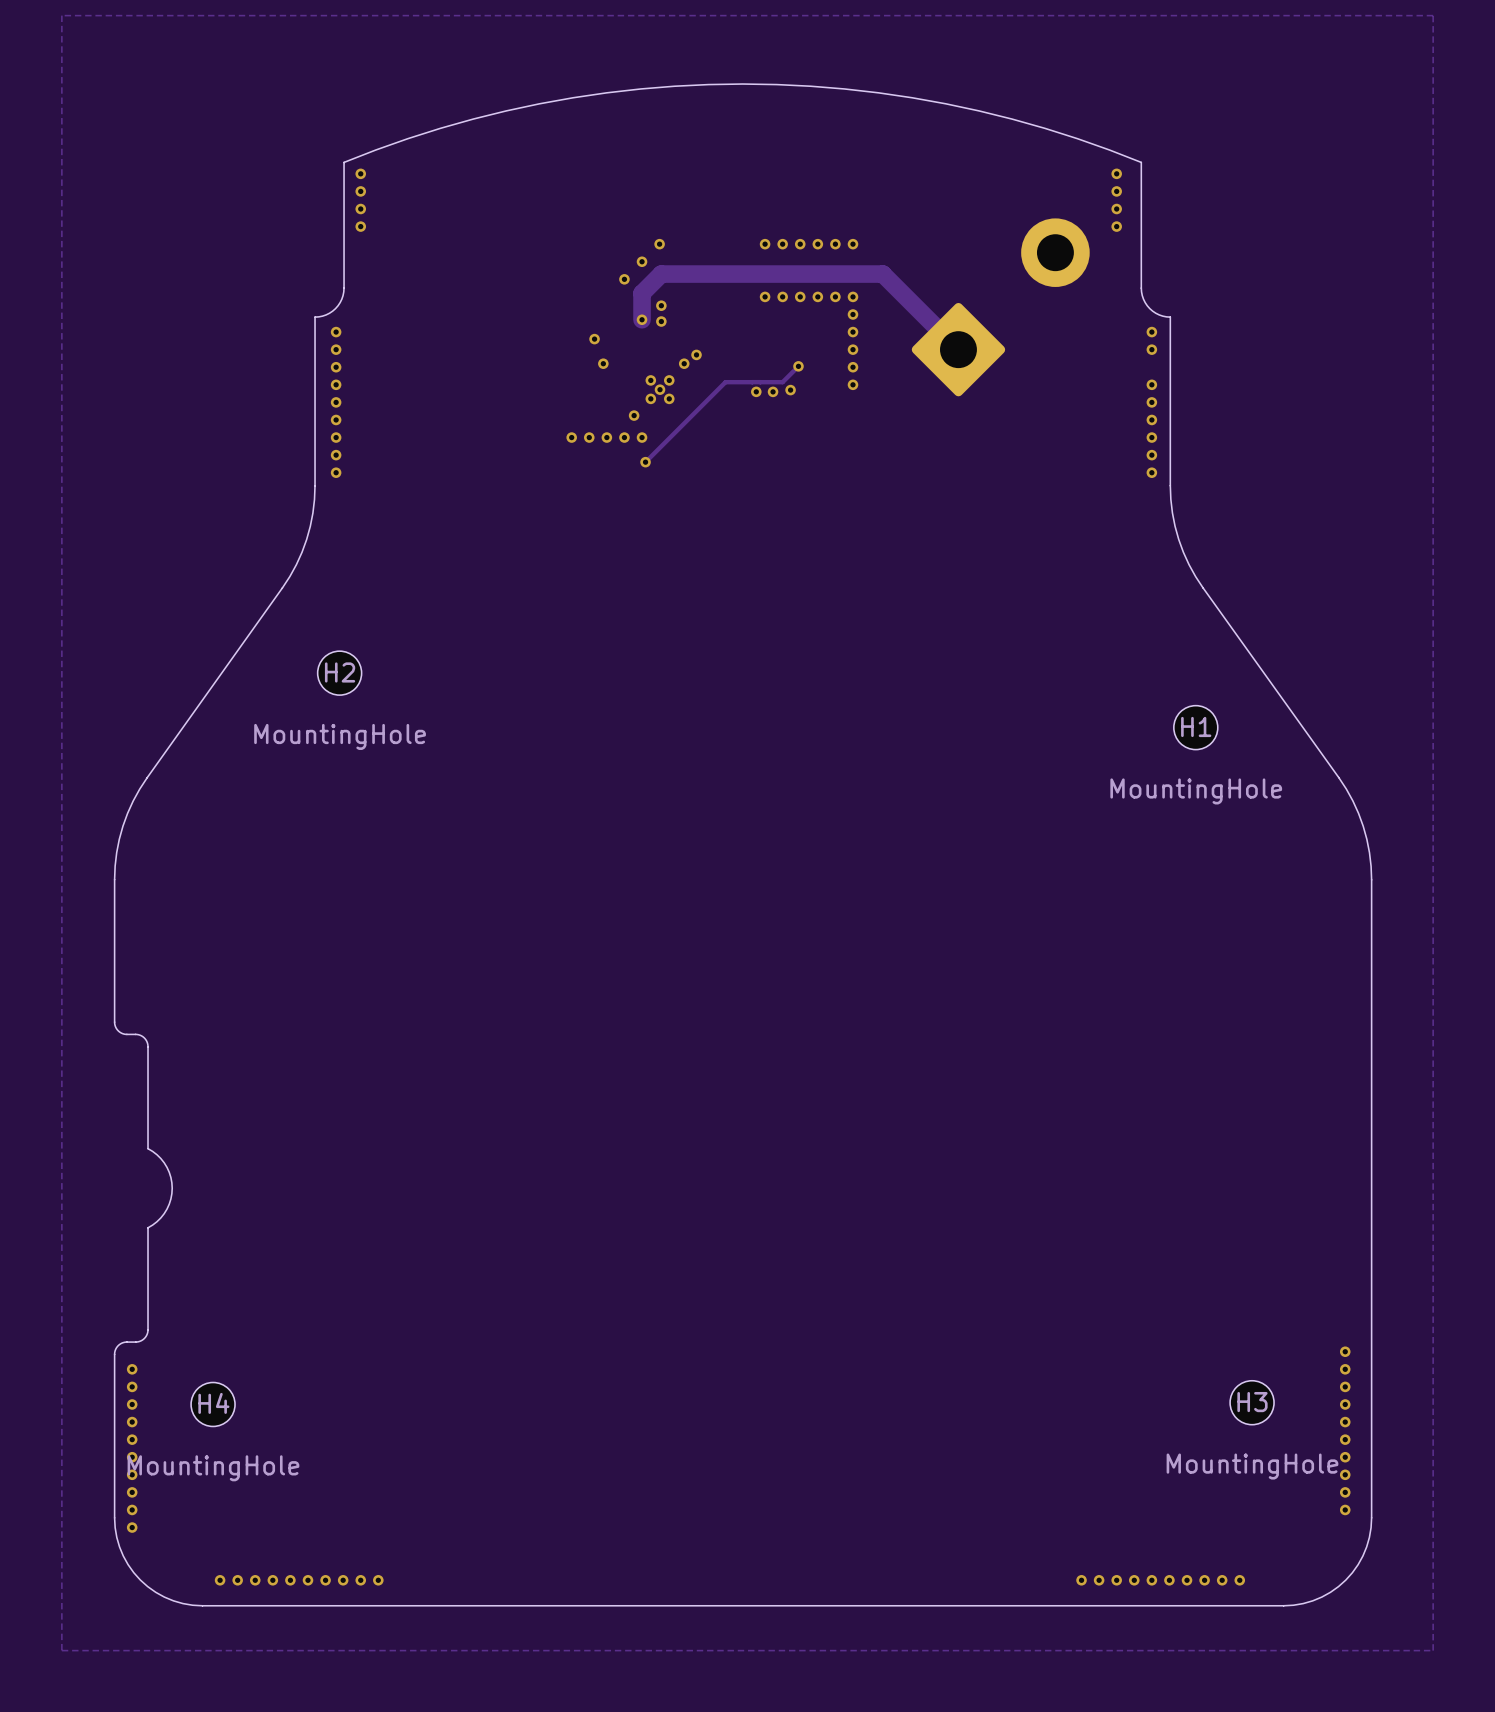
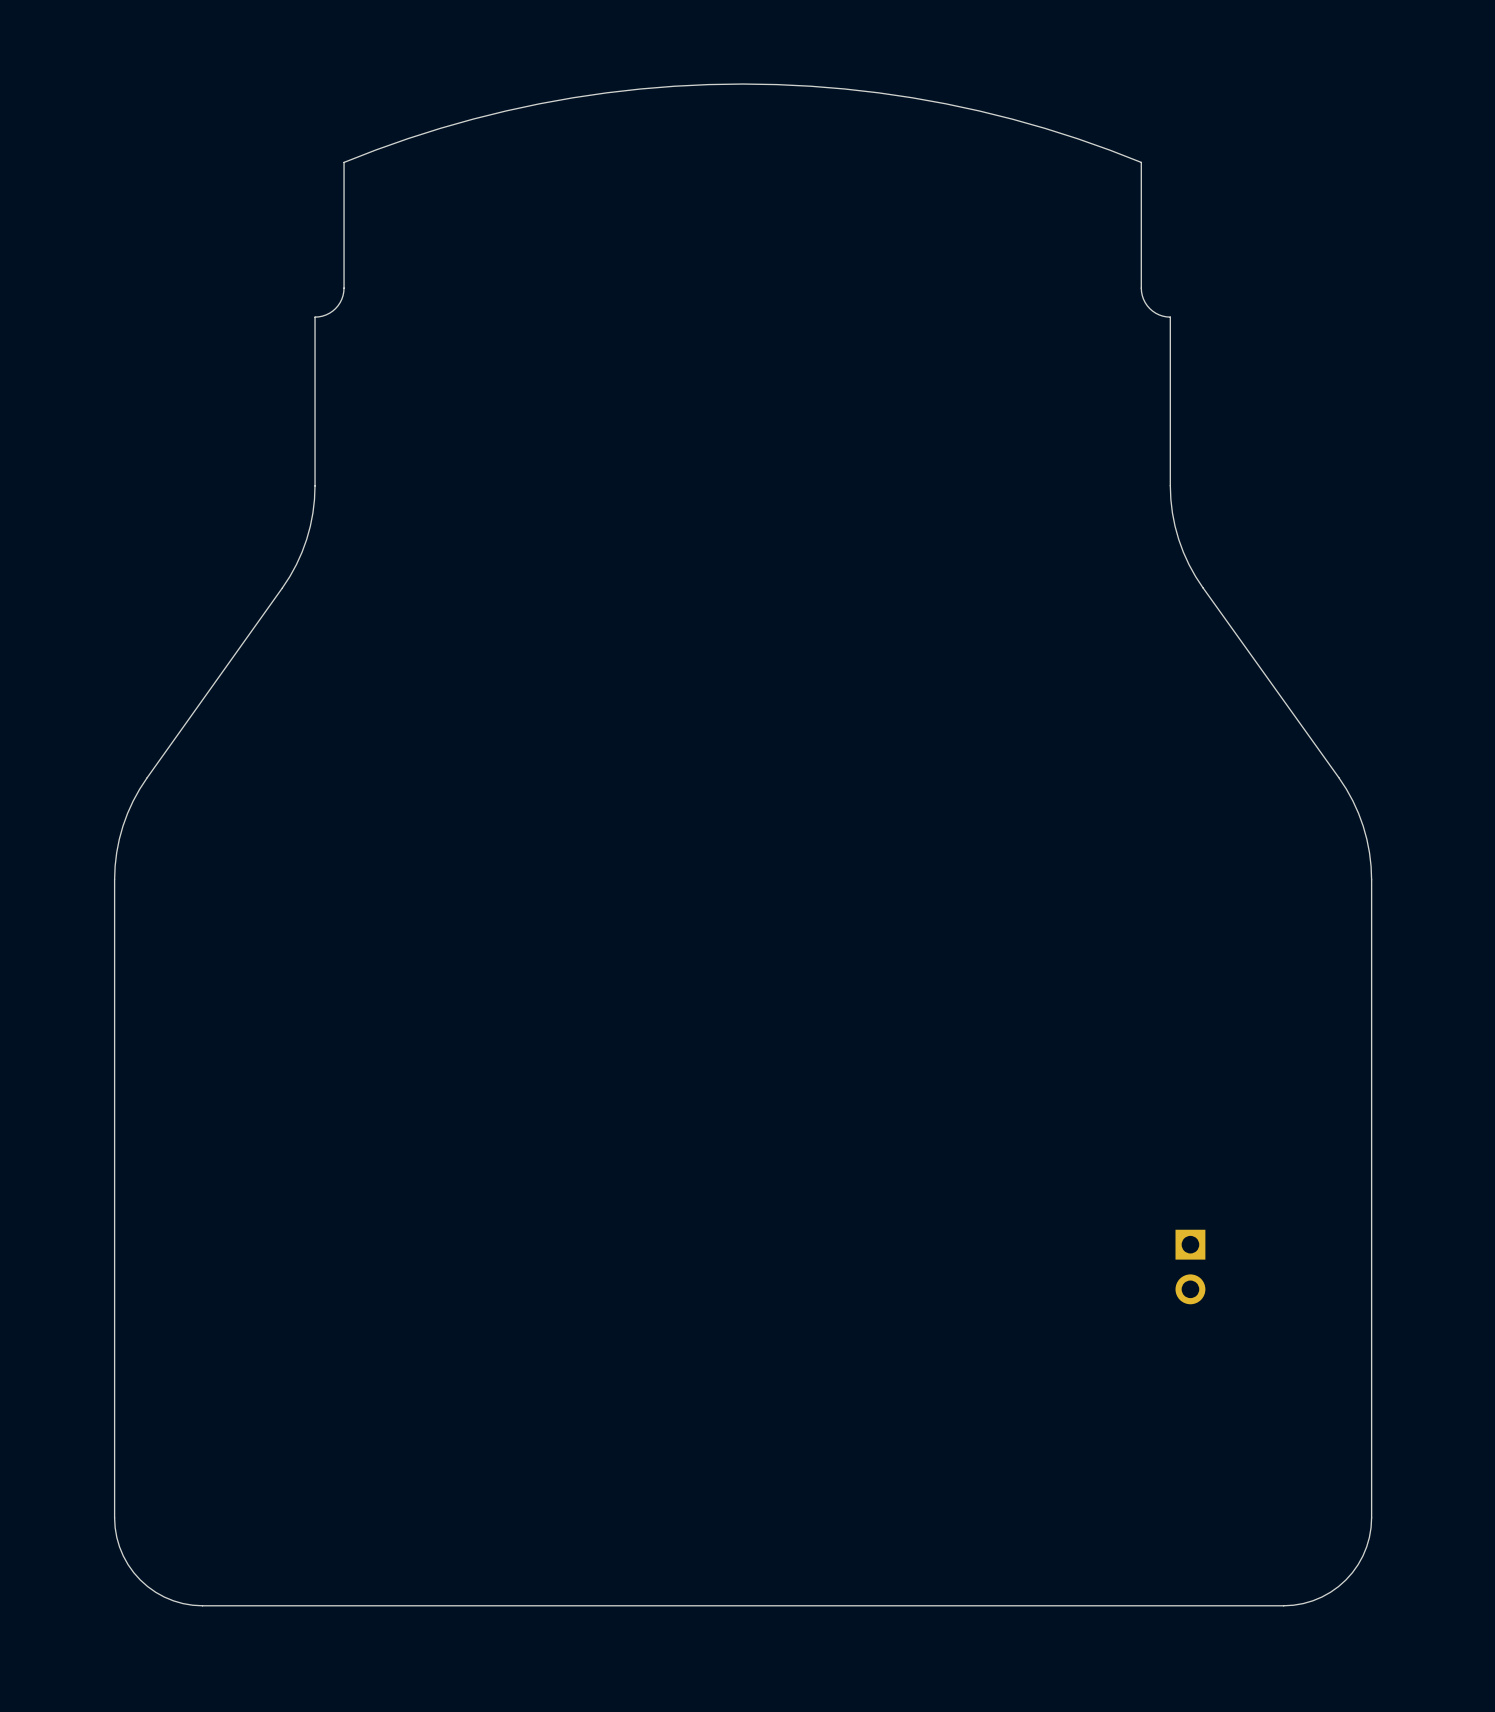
zone outline: (1433, 15) (61, 15) (61, 1650) (1433, 1650) (1433, 15) -> none
via: (360, 173) -> none
via: (1116, 173) -> none
via: (360, 191) -> none
via: (1116, 191) -> none
via: (360, 209) -> none
via: (1116, 209) -> none
via: (360, 226) -> none
via: (1116, 226) -> none
via: (659, 244) -> none
via: (765, 244) -> none
via: (782, 244) -> none
via: (800, 244) -> none
via: (817, 244) -> none
via: (835, 244) -> none
via: (852, 244) -> none
via: (642, 261) -> none
via: (624, 279) -> none
via: (765, 296) -> none
via: (782, 296) -> none
via: (800, 296) -> none
via: (817, 296) -> none
via: (835, 296) -> none
via: (852, 296) -> none
via: (661, 305) -> none
part: (1000, 307) -> none
via: (852, 314) -> none
track: (642, 319) (642, 293) (661, 274) (882, 274) (958, 349) -> none
via: (642, 319) -> none
via: (661, 321) -> none
via: (336, 332) -> none
via: (852, 332) -> none
via: (1151, 332) -> none
via: (594, 339) -> none
via: (336, 349) -> none
via: (852, 349) -> none
via: (1151, 349) -> none
via: (696, 354) -> none
via: (603, 363) -> none
via: (684, 363) -> none
track: (798, 366) (782, 382) (725, 382) (645, 462) -> none
via: (798, 366) -> none
via: (336, 367) -> none
via: (852, 367) -> none
via: (650, 380) -> none
via: (669, 380) -> none
via: (336, 384) -> none
via: (852, 384) -> none
via: (1151, 384) -> none
via: (660, 389) -> none
via: (790, 390) -> none
via: (756, 391) -> none
via: (773, 391) -> none
via: (650, 398) -> none
via: (669, 398) -> none
via: (336, 402) -> none
via: (1151, 402) -> none
via: (634, 415) -> none
via: (336, 419) -> none
via: (1151, 419) -> none
via: (336, 437) -> none
via: (571, 437) -> none
via: (589, 437) -> none
via: (606, 437) -> none
via: (624, 437) -> none
via: (642, 437) -> none
via: (1151, 437) -> none
via: (336, 455) -> none
via: (1151, 455) -> none
via: (645, 462) -> none
via: (336, 472) -> none
via: (1151, 472) -> none
H2: MountingHole (339, 673) -> none
H1: MountingHole (1195, 727) -> none
board edge: (114, 1022) (115, 1027) (120, 1032) (139, 1035) (147, 1042) (148, 1148) (160, 1158) (167, 1167) (172, 1188) (170, 1198) (164, 1213) (148, 1227) (147, 1333) (139, 1341) (120, 1343) (116, 1347) (114, 1354) -> (114, 1022) (114, 1354)
part: none -> (1190, 1267)
via: (1345, 1351) -> none
via: (132, 1369) -> none
via: (1345, 1369) -> none
via: (132, 1386) -> none
via: (1345, 1386) -> none
H3: MountingHole (1252, 1402) -> none
via: (132, 1404) -> none
H4: MountingHole (213, 1404) -> none
via: (1345, 1404) -> none
via: (132, 1422) -> none
via: (1345, 1422) -> none
via: (132, 1439) -> none
via: (1345, 1439) -> none
via: (132, 1457) -> none
via: (1345, 1457) -> none
via: (132, 1474) -> none
via: (1345, 1474) -> none
via: (132, 1492) -> none
via: (1345, 1492) -> none
via: (132, 1509) -> none
via: (1345, 1509) -> none
via: (132, 1527) -> none
via: (220, 1580) -> none
via: (237, 1580) -> none
via: (255, 1580) -> none
via: (272, 1580) -> none
via: (290, 1580) -> none
via: (307, 1580) -> none
via: (325, 1580) -> none
via: (343, 1580) -> none
via: (360, 1580) -> none
via: (378, 1580) -> none
via: (1081, 1580) -> none
via: (1099, 1580) -> none
via: (1116, 1580) -> none
via: (1134, 1580) -> none
via: (1151, 1580) -> none
via: (1169, 1580) -> none
via: (1187, 1580) -> none
via: (1204, 1580) -> none
via: (1222, 1580) -> none
via: (1239, 1580) -> none

